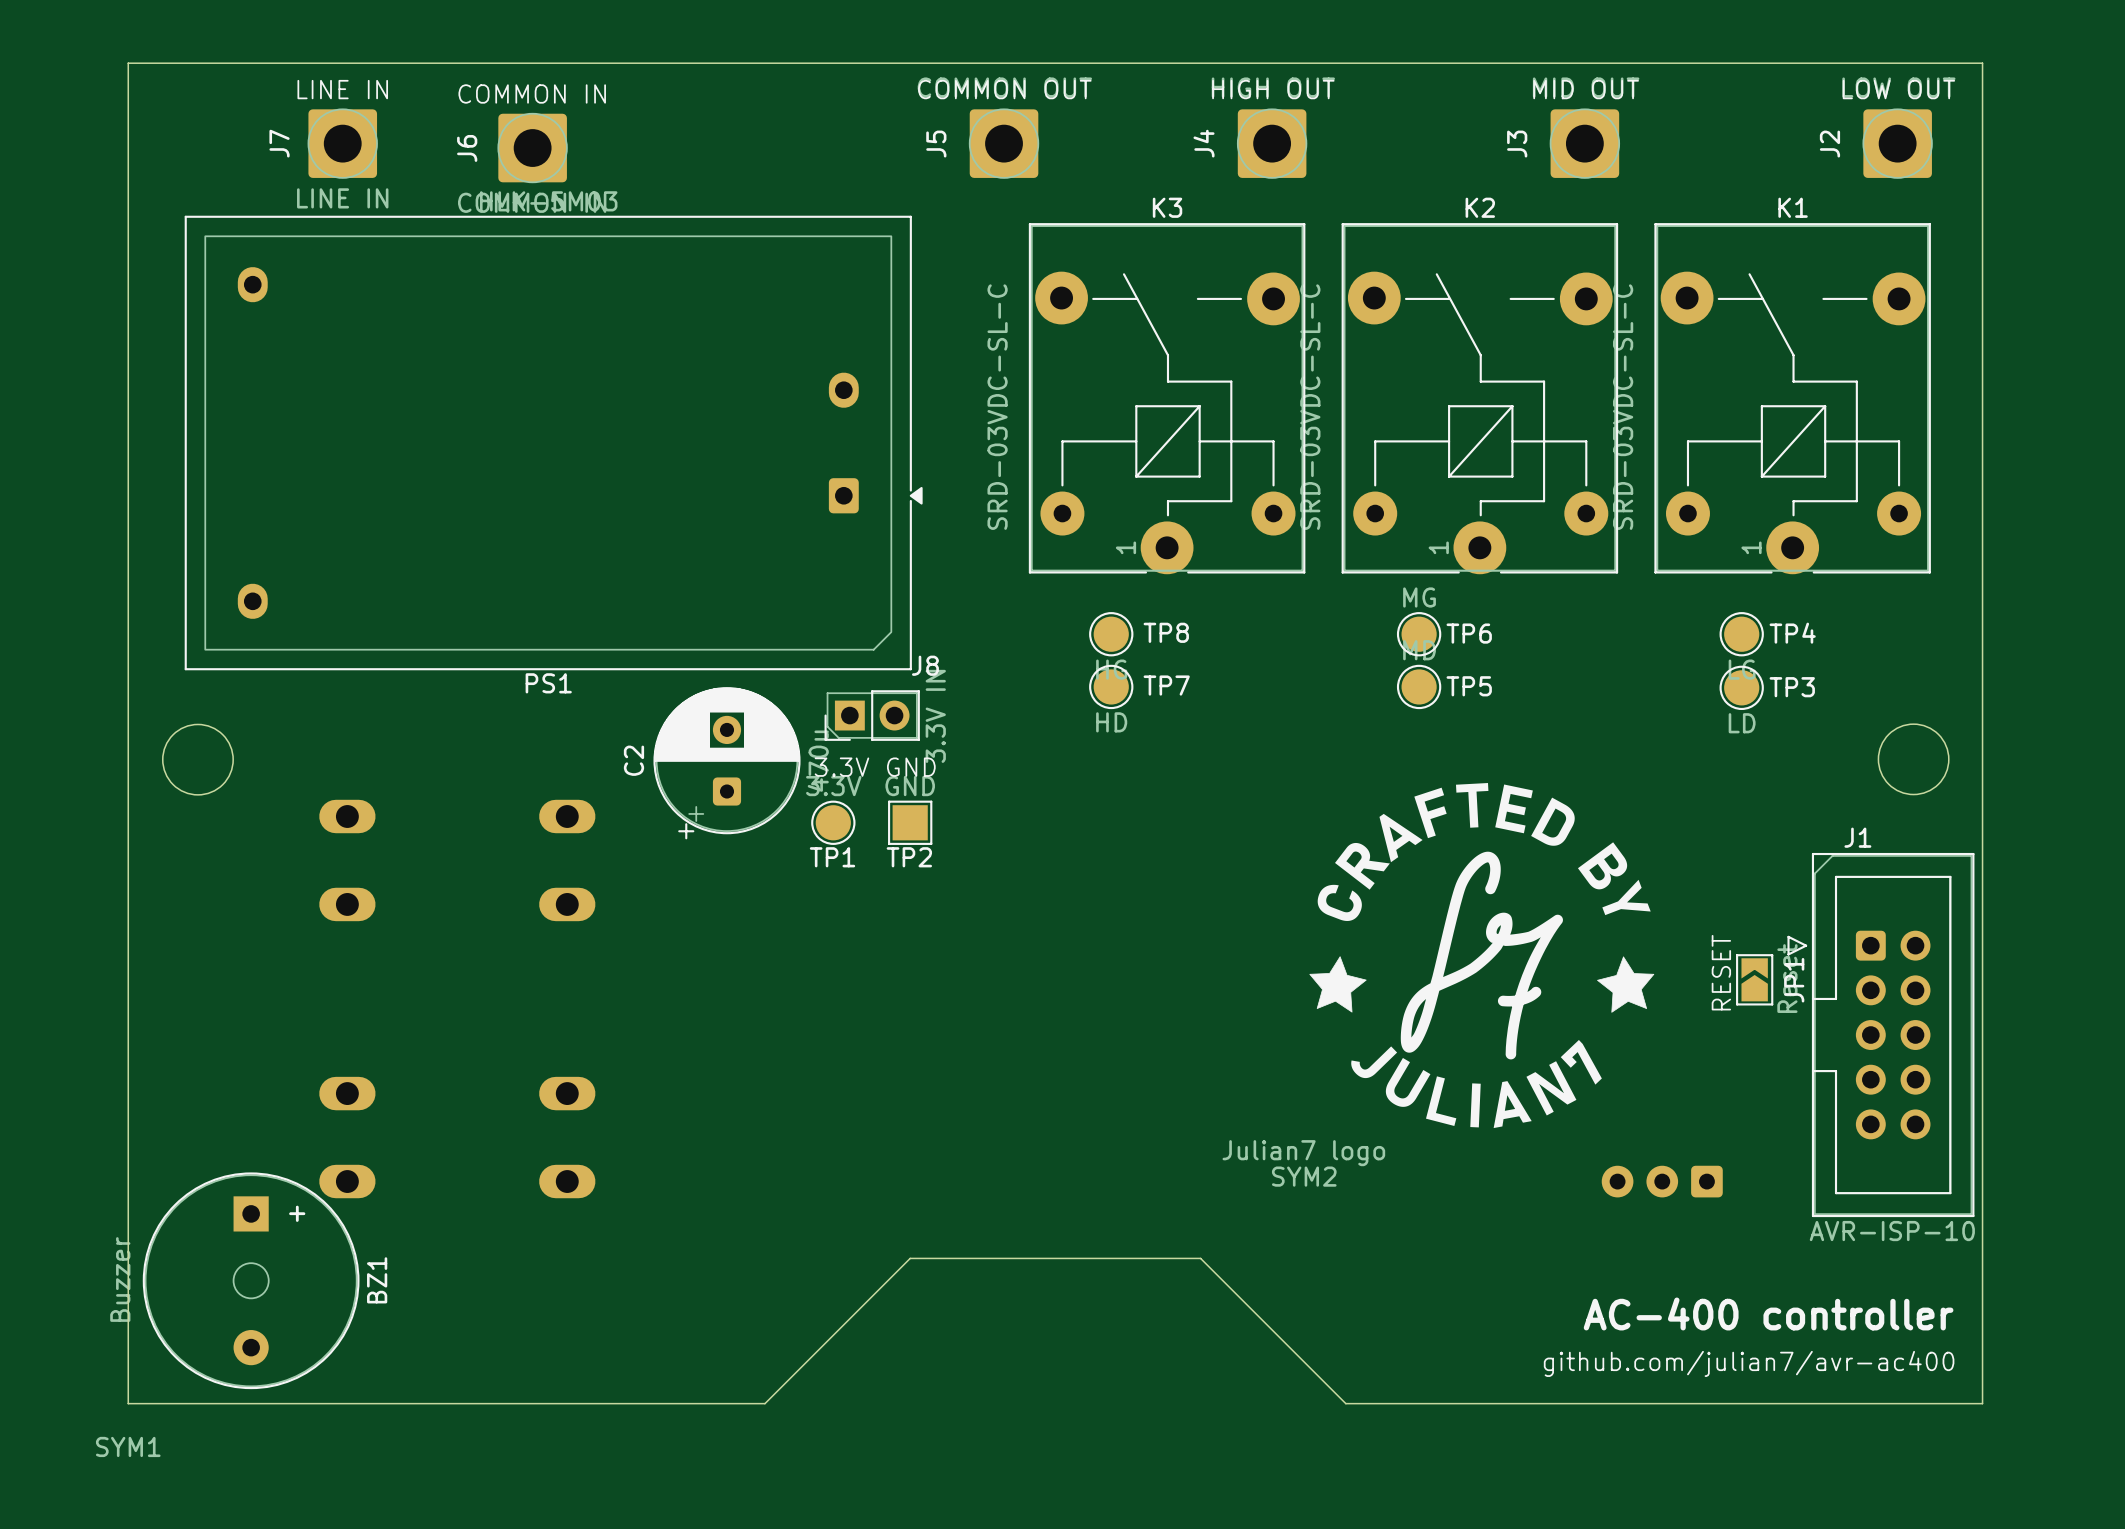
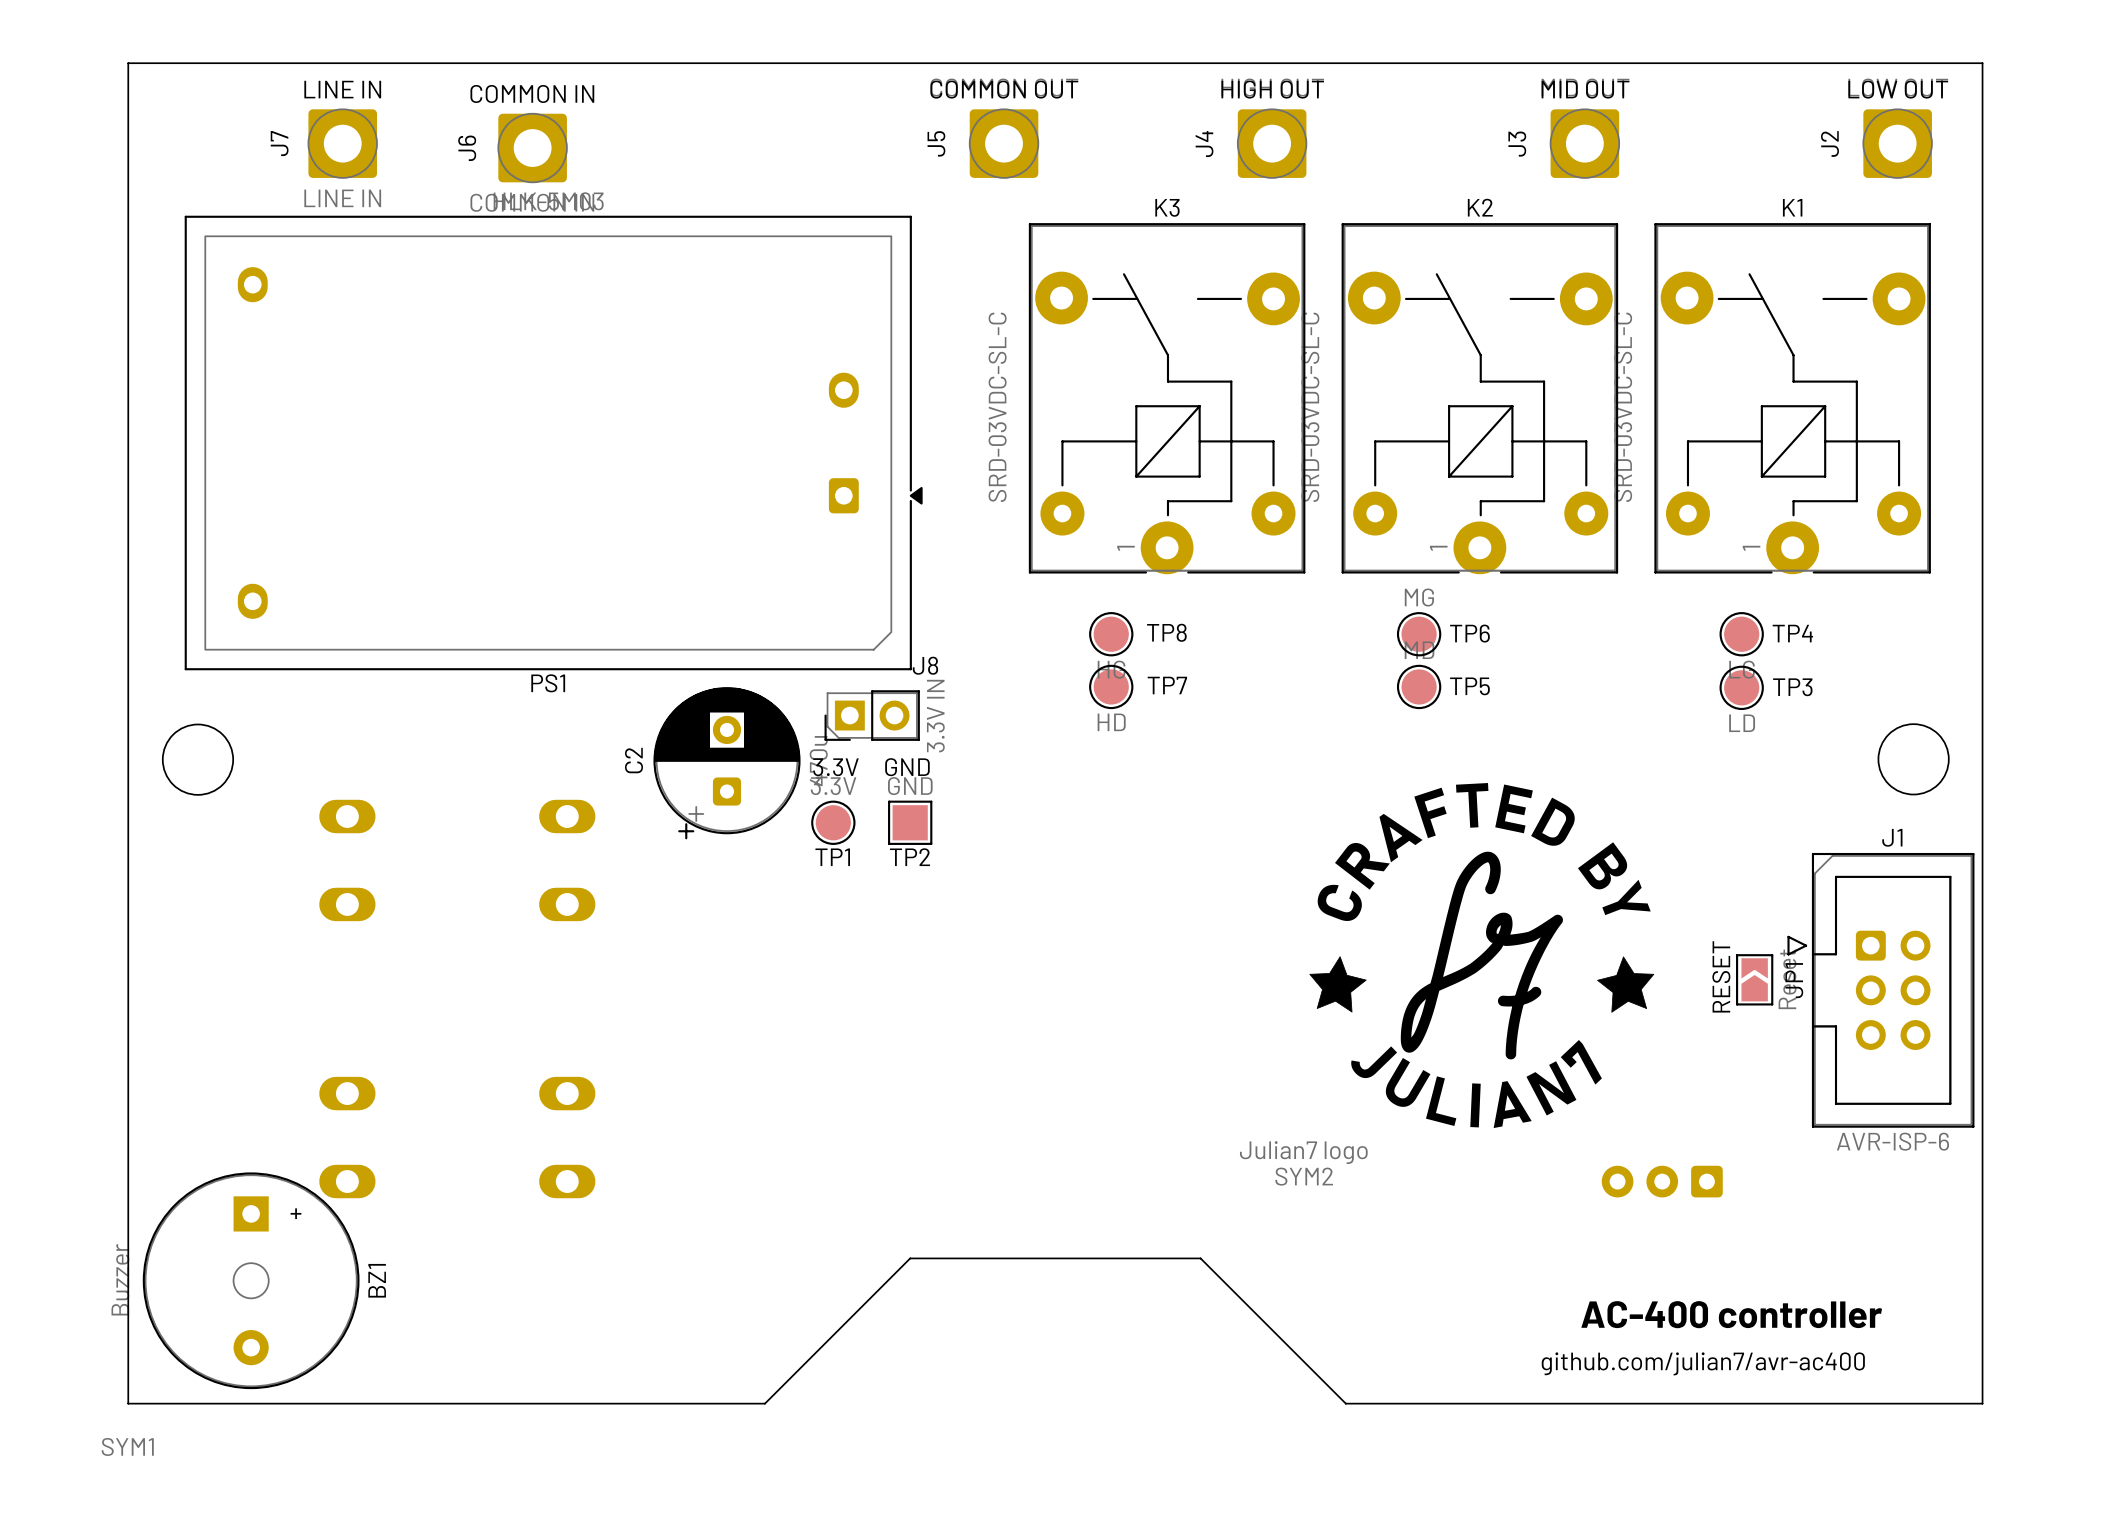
J1 name position: J1 (1857, 837) -> J1 (1892, 837)
J1 footprint: [1787, 852, 1975, 1218] -> [1787, 852, 1975, 1128]
J1 value: AVR-ISP-10 (1892, 1231) -> AVR-ISP-6 (1892, 1141)

